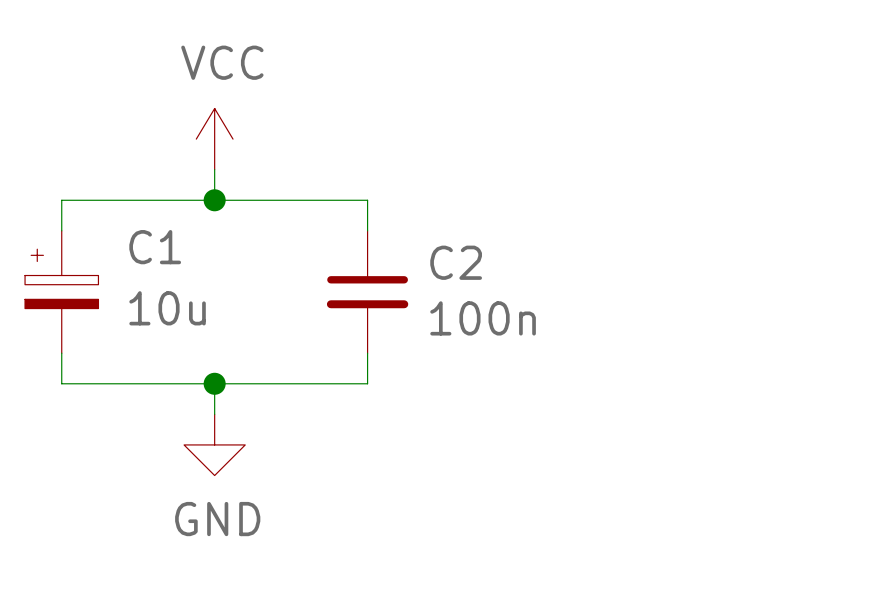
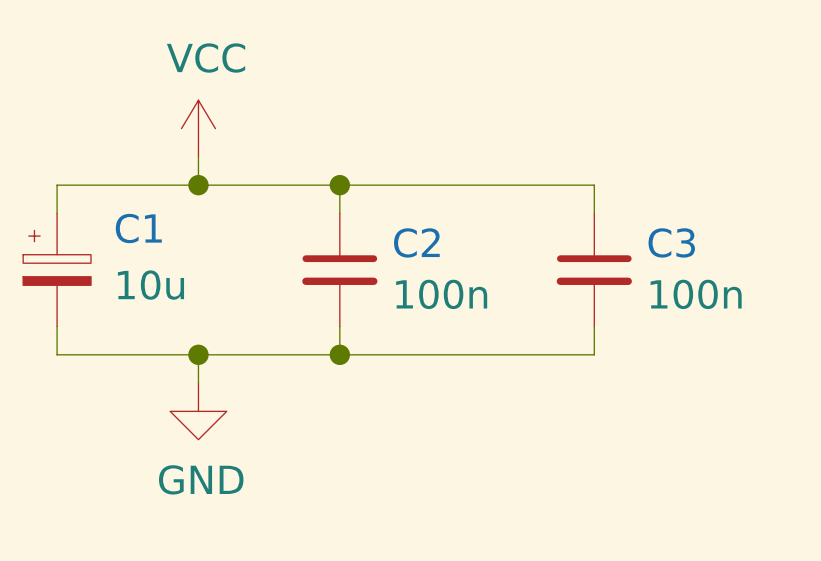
wire: none -> (339, 185) (594, 185) (594, 213)
junction: none -> (339, 185)
C3: none -> 100n (594, 269)
wire: none -> (594, 326) (594, 354) (339, 354)
junction: none -> (339, 354)

